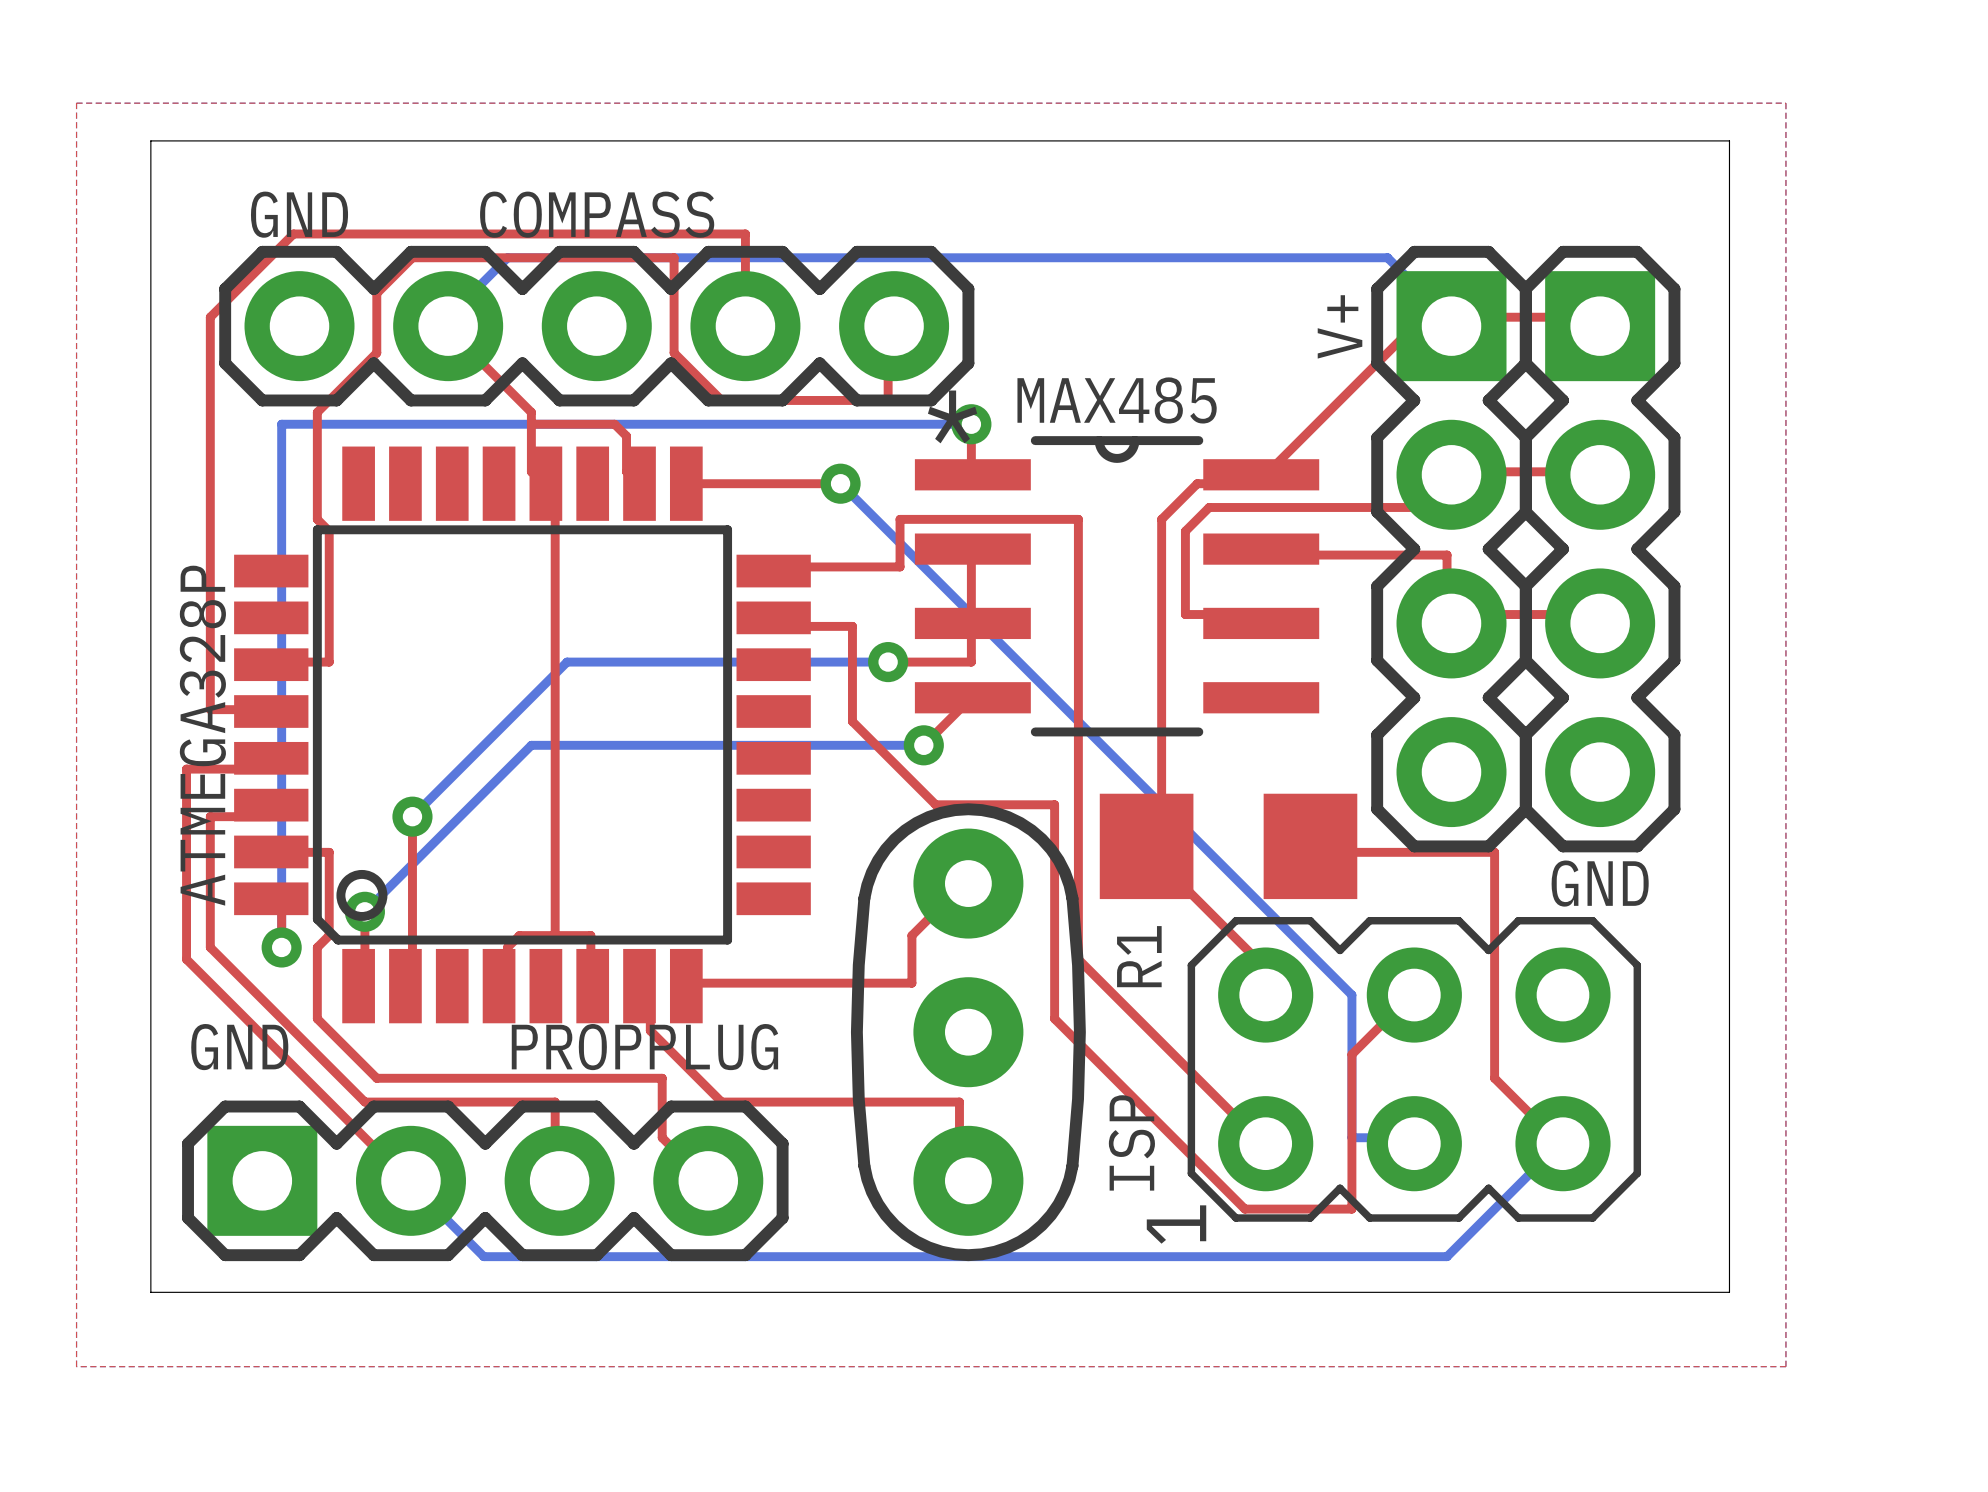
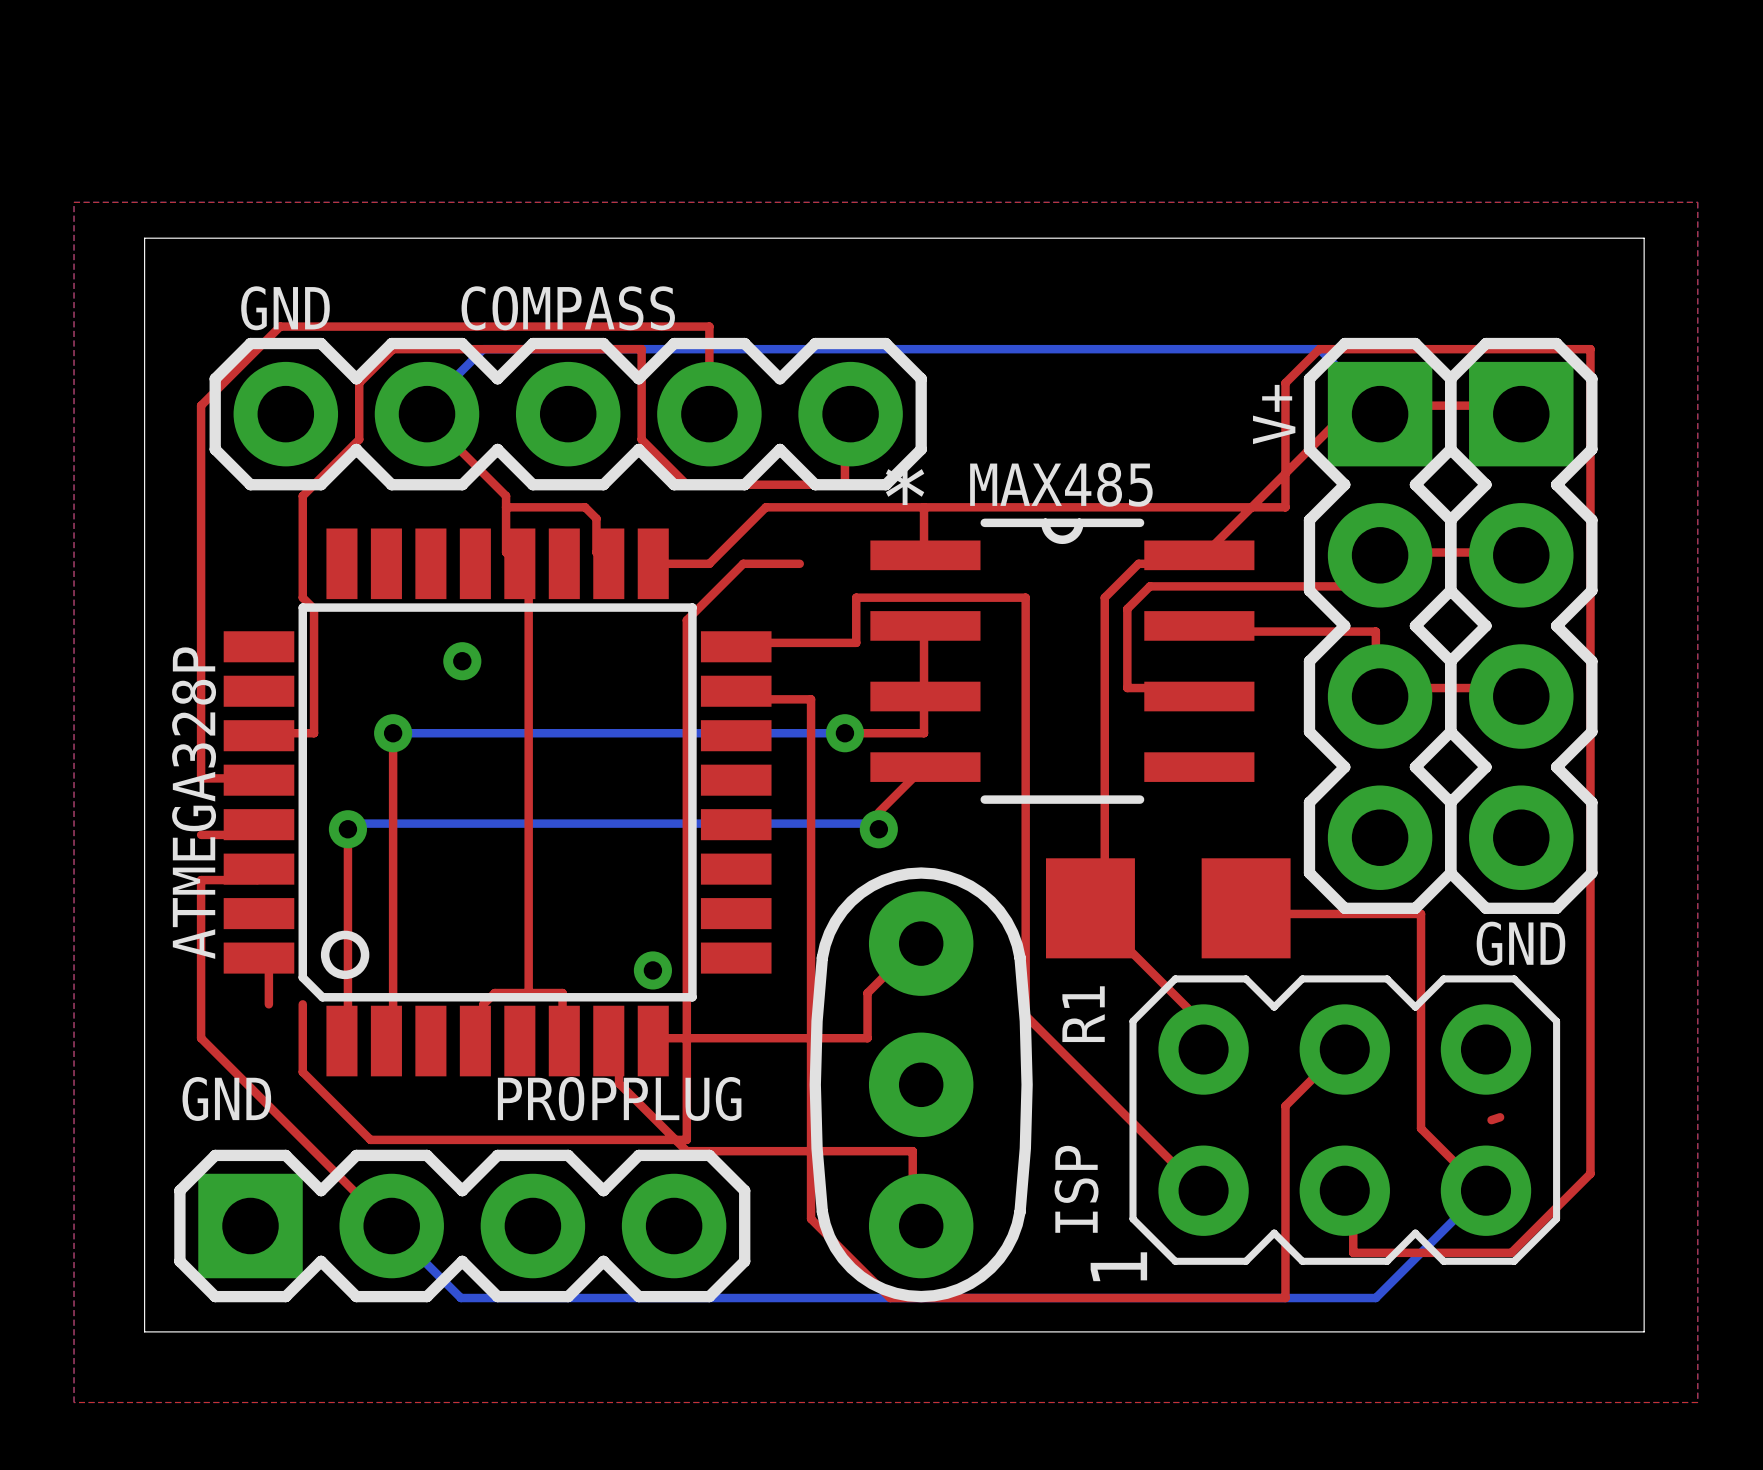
bottom track: (971, 424) (281, 424) (281, 947) -> none
via: (971, 424) -> none
top track: (745, 483) (781, 483) -> (359, 1128) (370, 1139) (686, 1139) (686, 620) (743, 563)
top track: none -> (709, 563) (765, 507) (1285, 507) (1285, 383) (1319, 349) (1590, 349) (1590, 1173) (1511, 1252) (1353, 1252) (1353, 1196) (1344, 1190)
bottom track: (840, 483) (1351, 995) (1351, 1137) (1411, 1137) (1414, 1143) -> none
via: (840, 483) -> none
via: none -> (462, 661)
top track: none -> (393, 733) (393, 880)
via: none -> (393, 733)
bottom track: (567, 662) (412, 816) -> (539, 733) (393, 733)
top track: (852, 721) (935, 804) (1054, 804) (1054, 1018) (1244, 1209) (1351, 1209) -> (811, 789) (811, 1218) (890, 1298) (1285, 1298) (1285, 1252)
bottom track: (923, 745) (531, 745) (364, 911) -> none
via position: (923, 745) -> (878, 829)
top track: none -> (347, 829) (347, 970)
bottom track: none -> (347, 829) (347, 823) (878, 823) (878, 829)
top track: (210, 769) (186, 769) (186, 959) (210, 983) -> (201, 1004) (201, 1038)
via position: (412, 816) -> (347, 829)
top track: (271, 851) (329, 852) (329, 935) (317, 947) -> none
via: (364, 911) -> none
via: none -> (652, 970)
top track: (210, 947) (364, 1102) (555, 1102) (555, 1173) (559, 1180) -> none
via: (281, 947) -> none
top track: none -> (1500, 1117) (1491, 1120)
top track: (376, 1078) (662, 1078) (662, 1137) (697, 1173) (708, 1180) -> none

